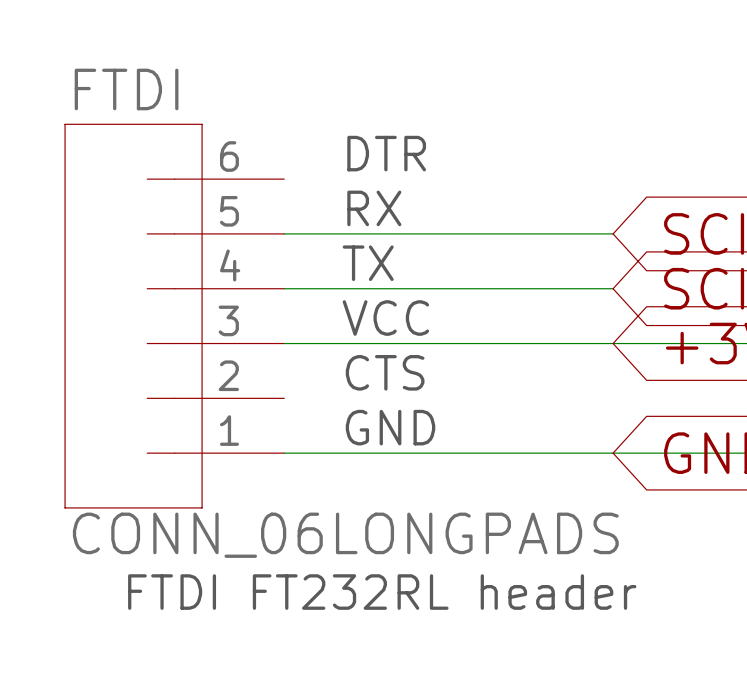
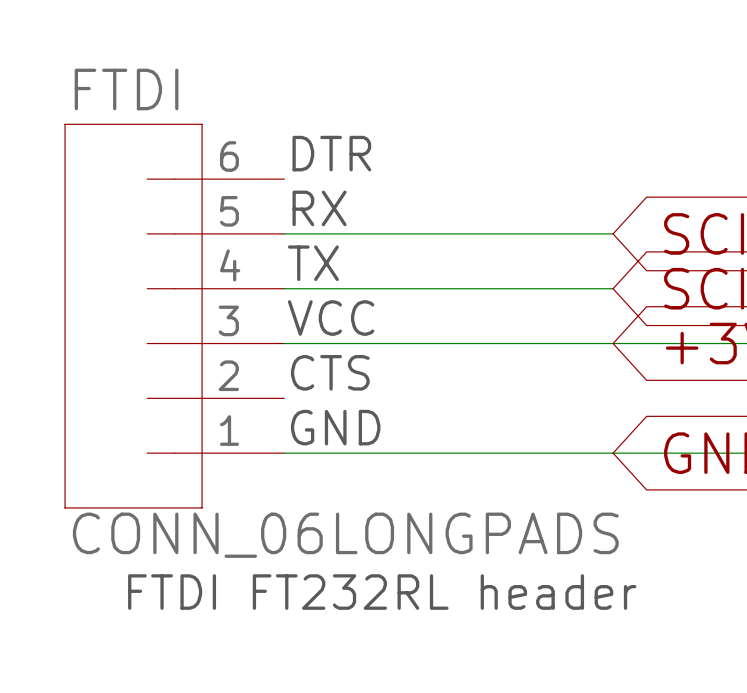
text position: DTR (386, 153) -> DTR (331, 153)
text position: RX (374, 208) -> RX (319, 208)
text position: TX (368, 263) -> TX (313, 263)
text position: VCC (385, 318) -> VCC (331, 318)
text position: CTS (385, 372) -> CTS (330, 372)
text position: GND (390, 427) -> GND (335, 427)

